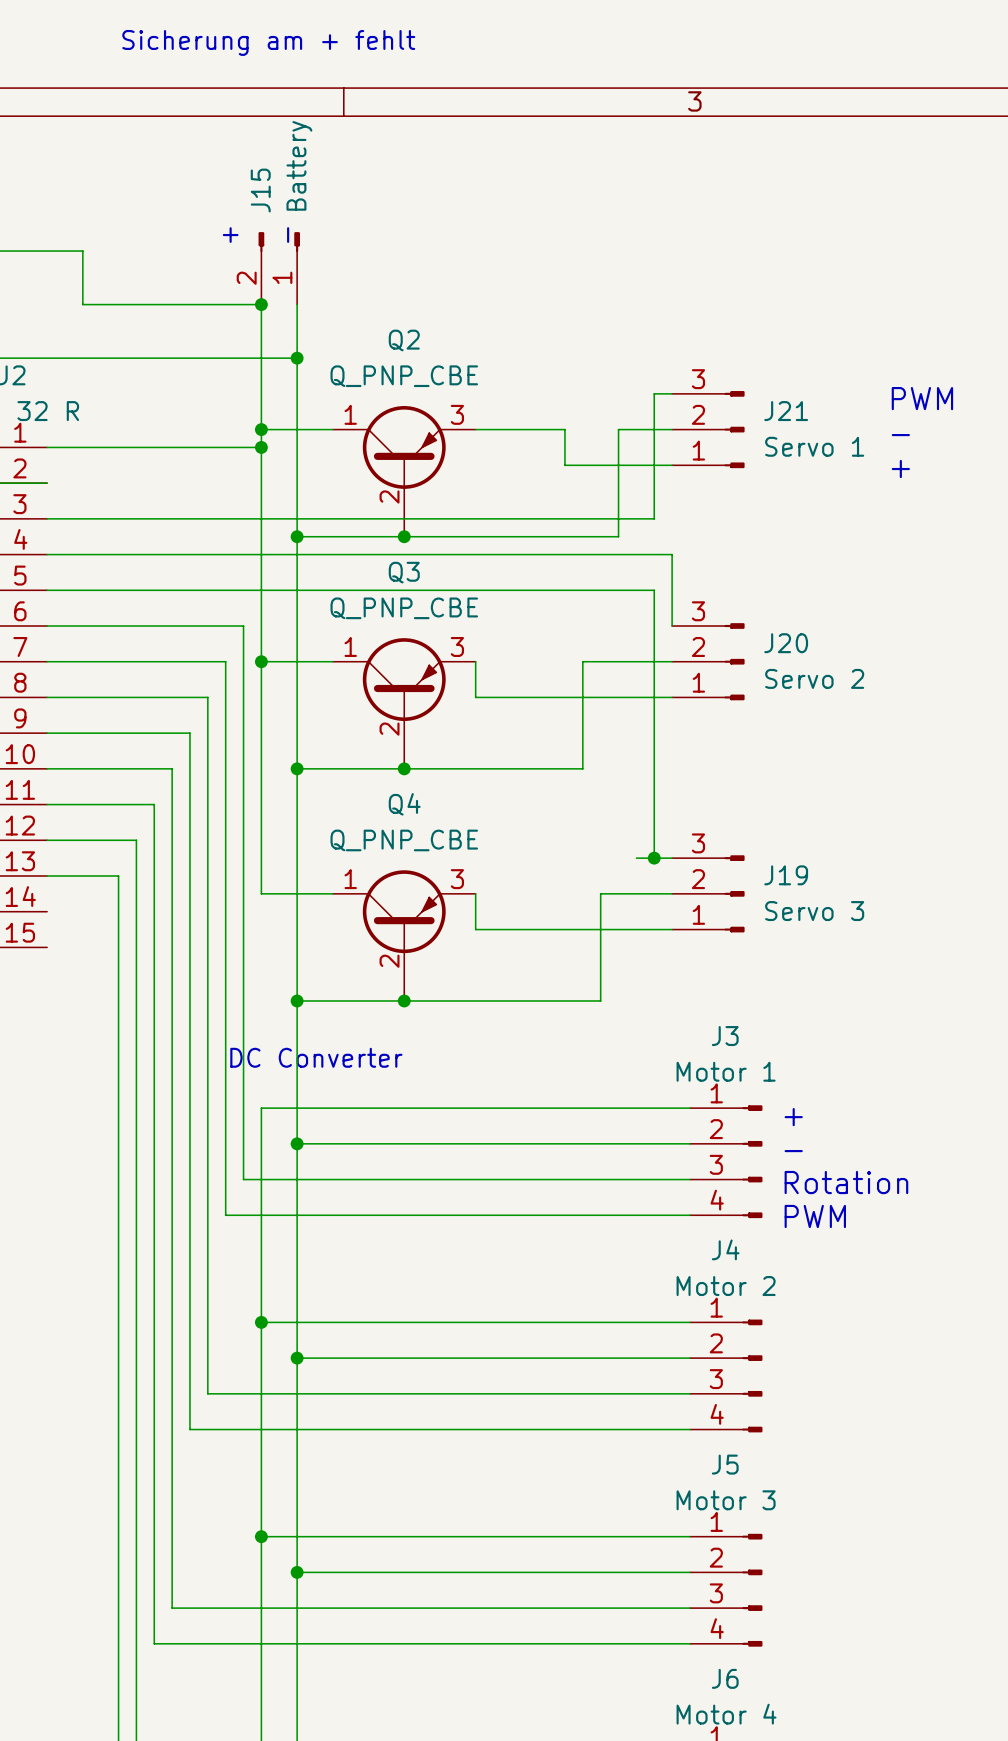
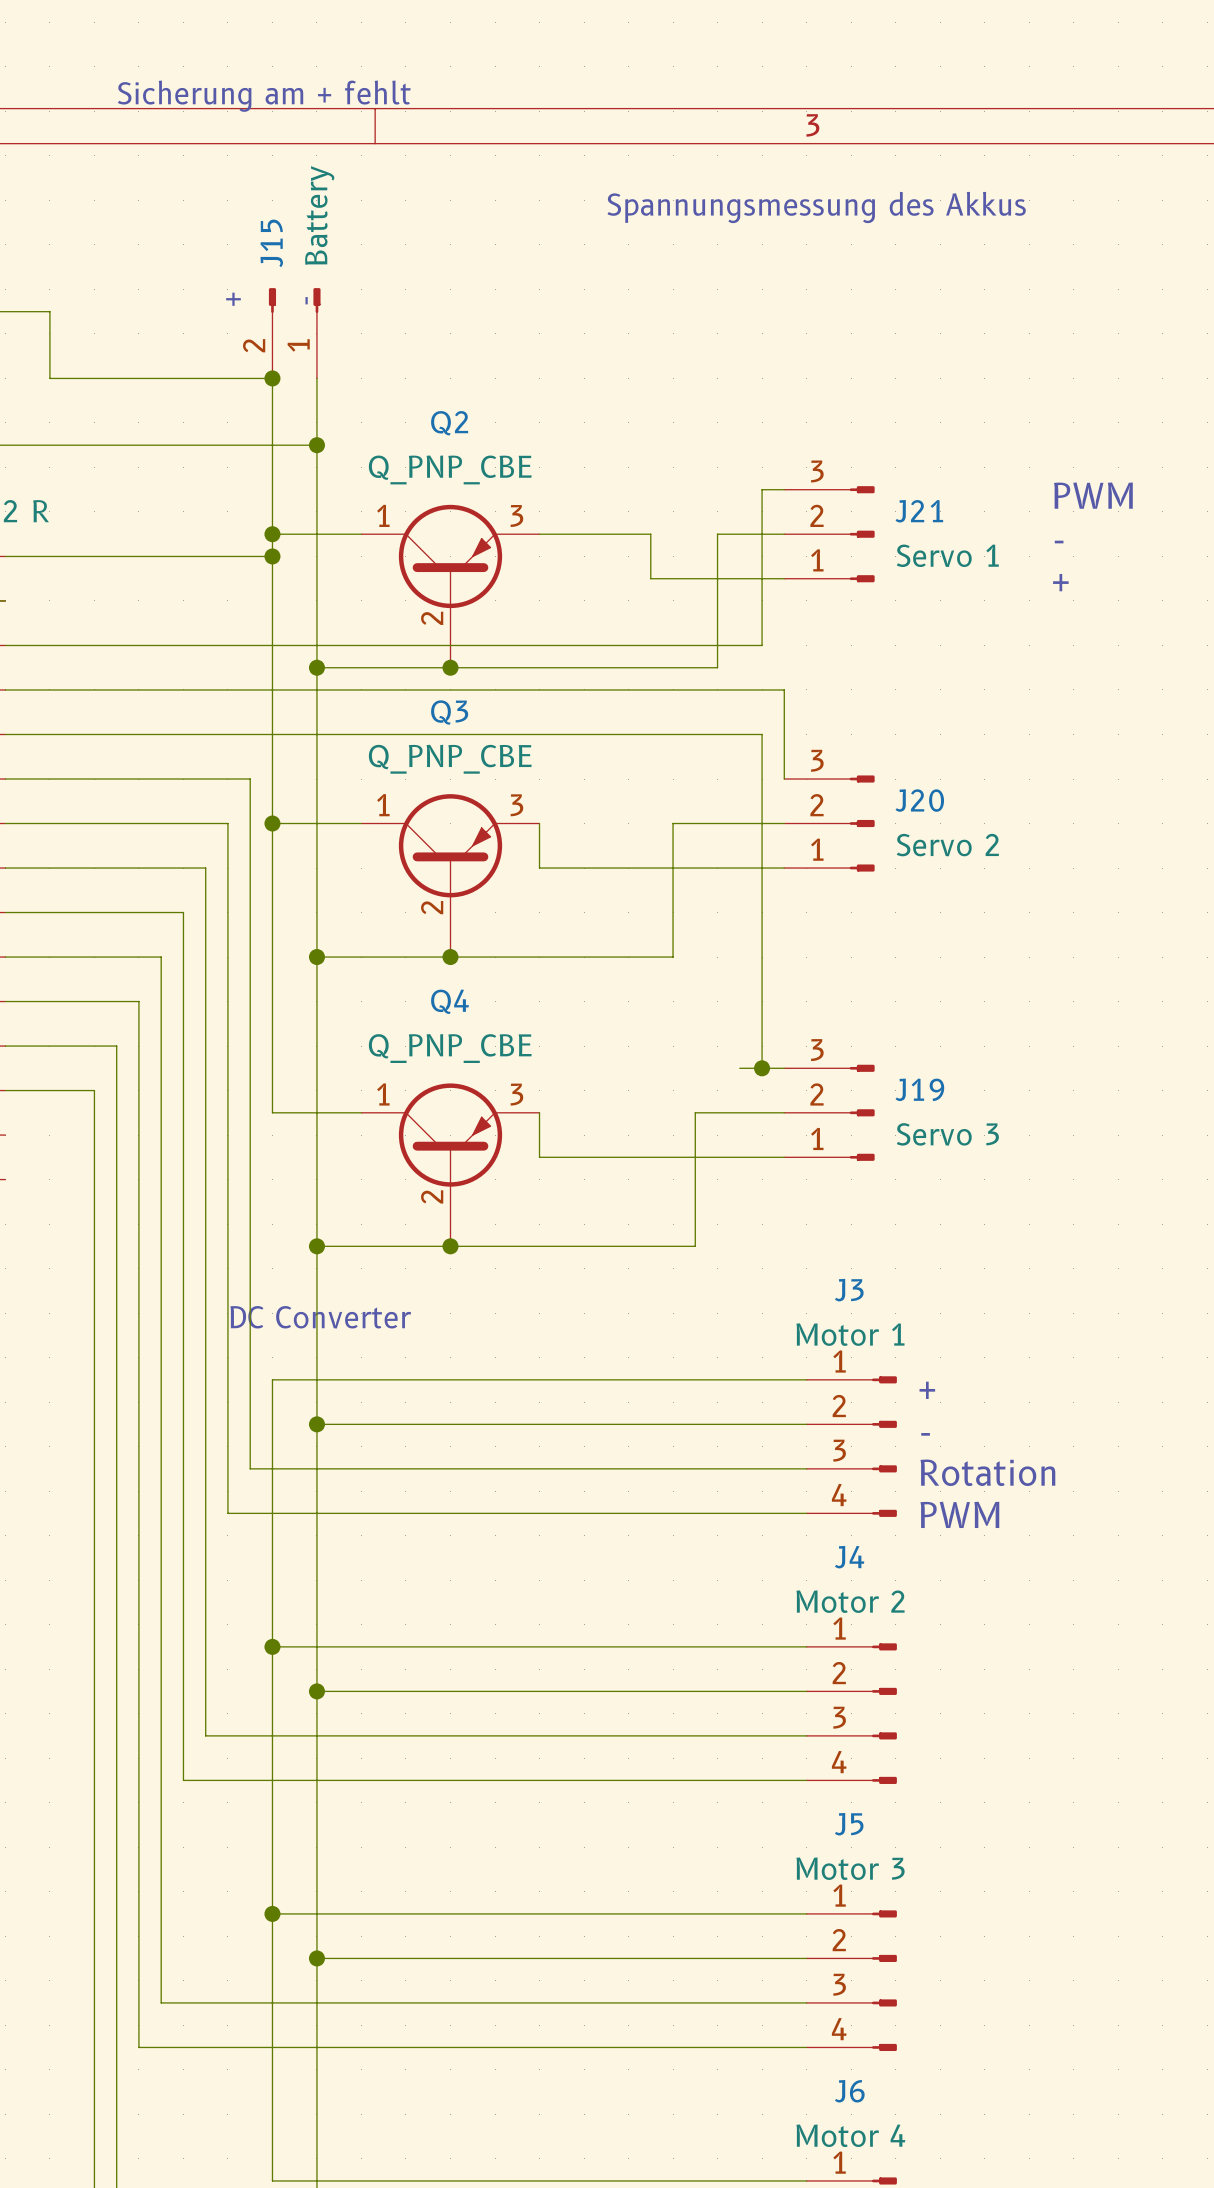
text position: Sicherung am + fehlt (268, 42) -> Sicherung am + fehlt (264, 96)
text: none -> Spannungsmessung des Akkus (816, 207)

